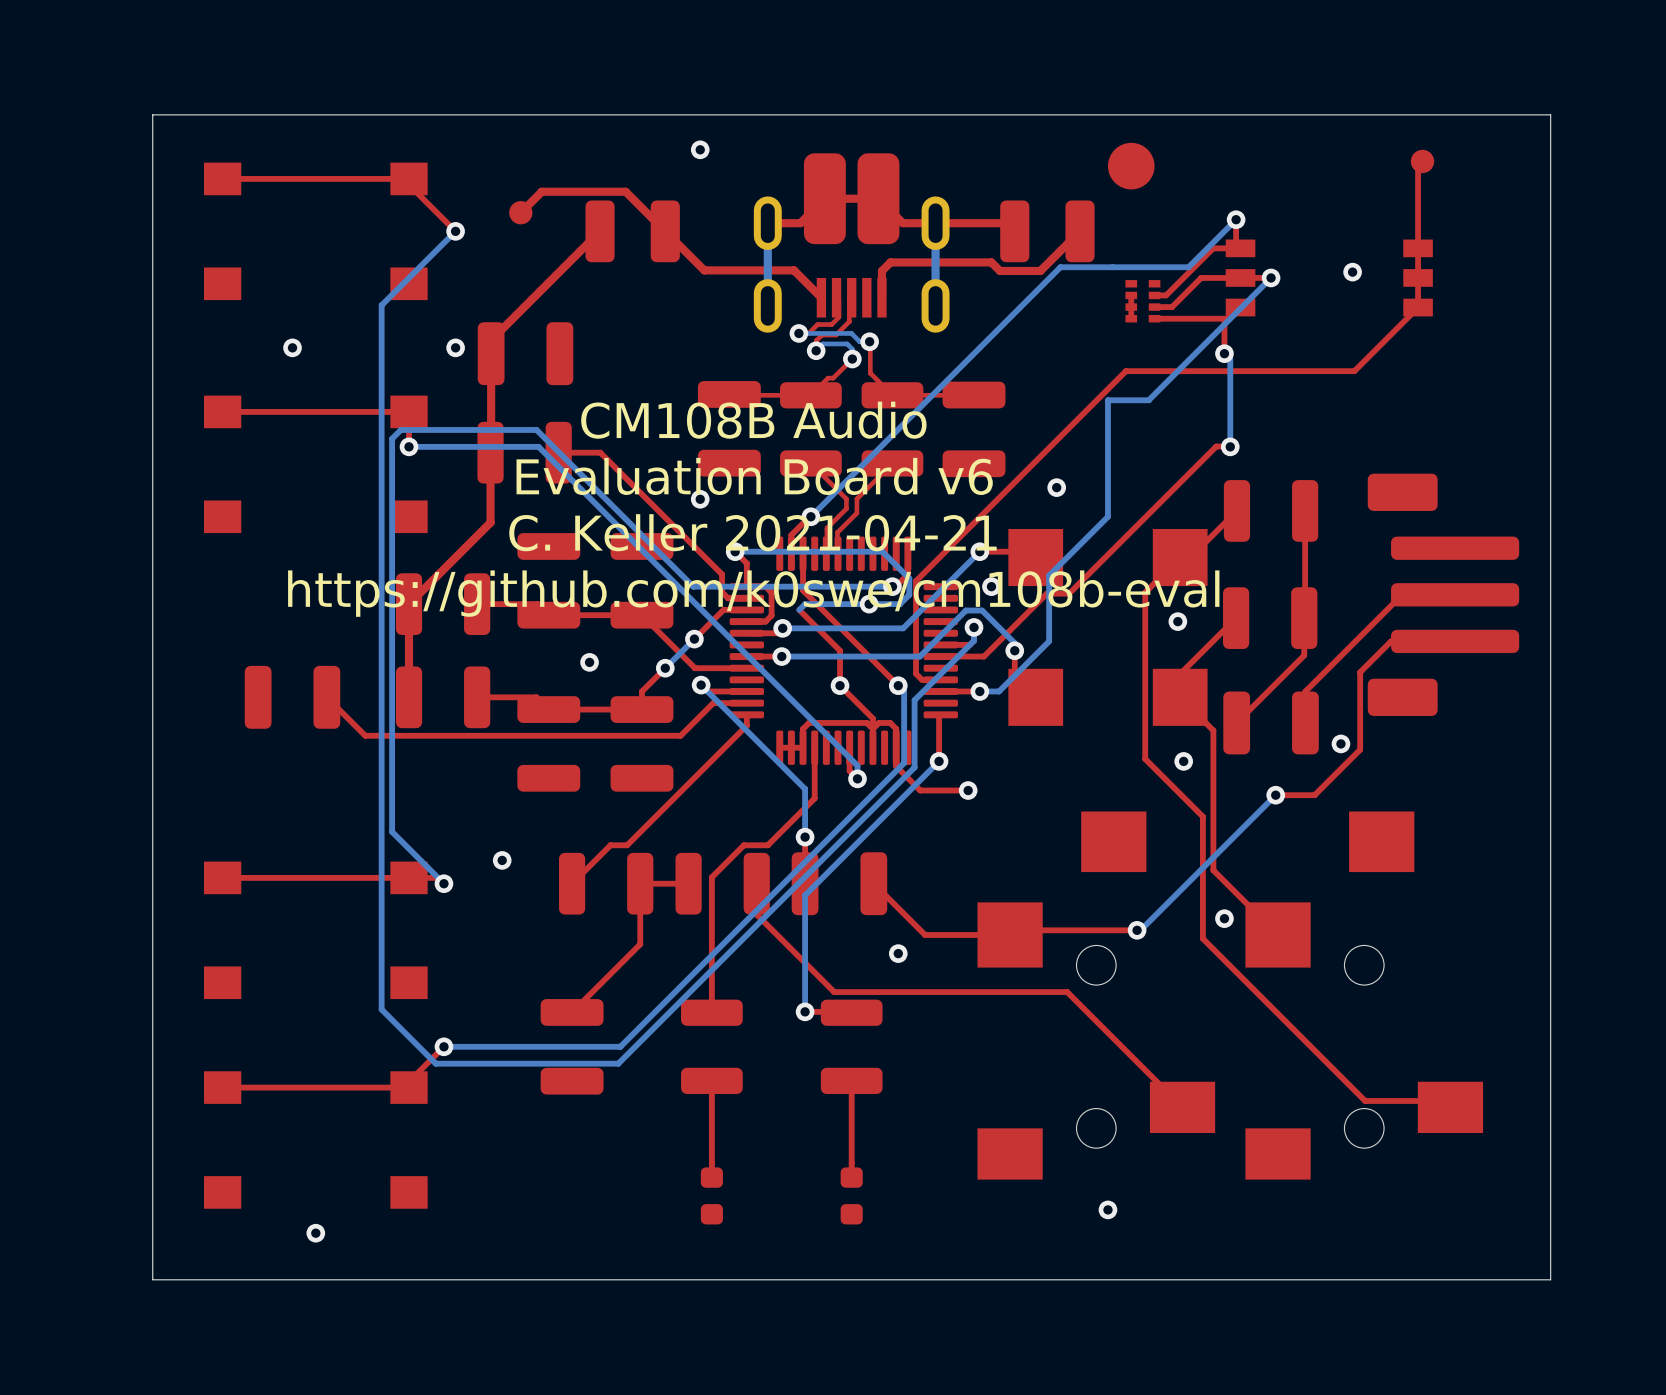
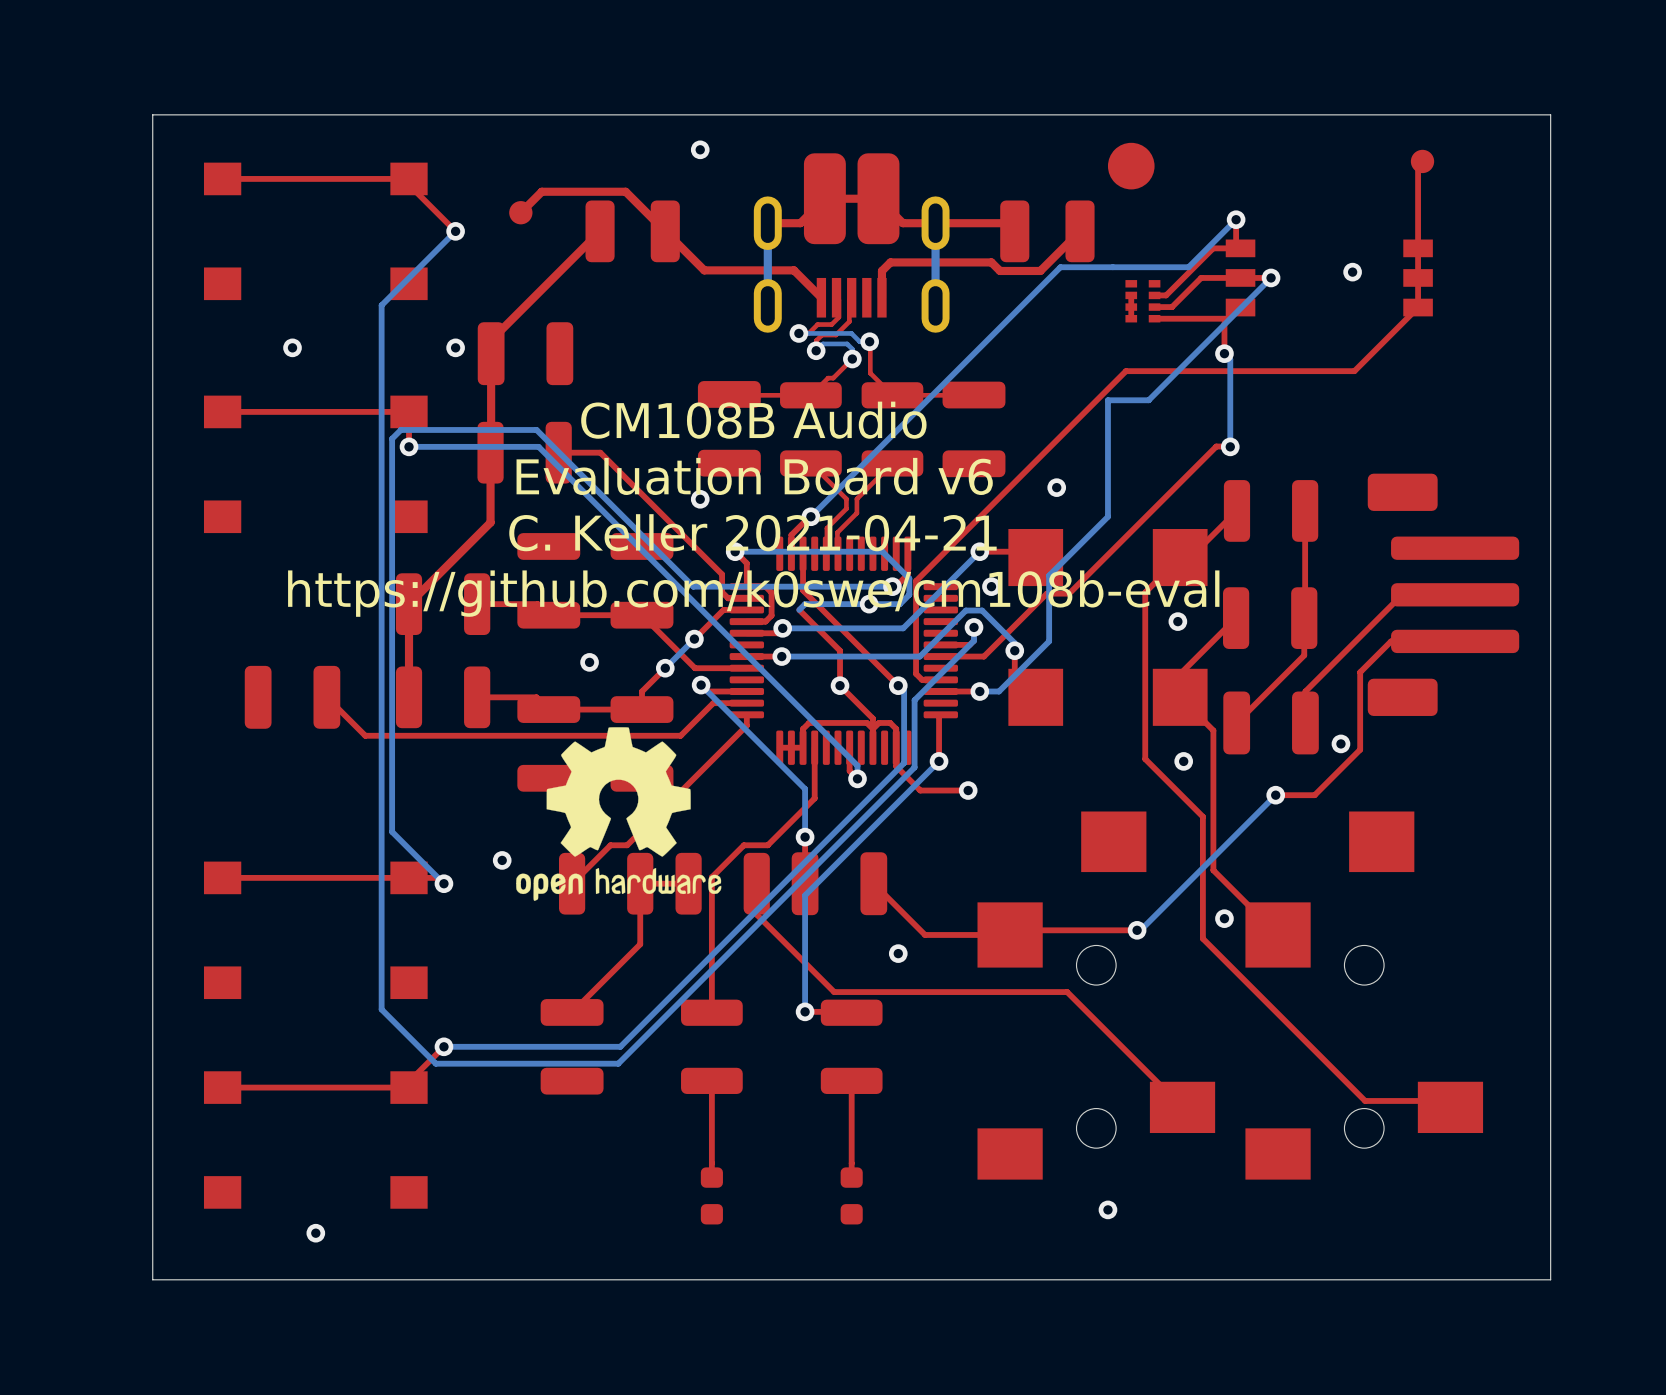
drawing: none -> [516, 727, 722, 901]

